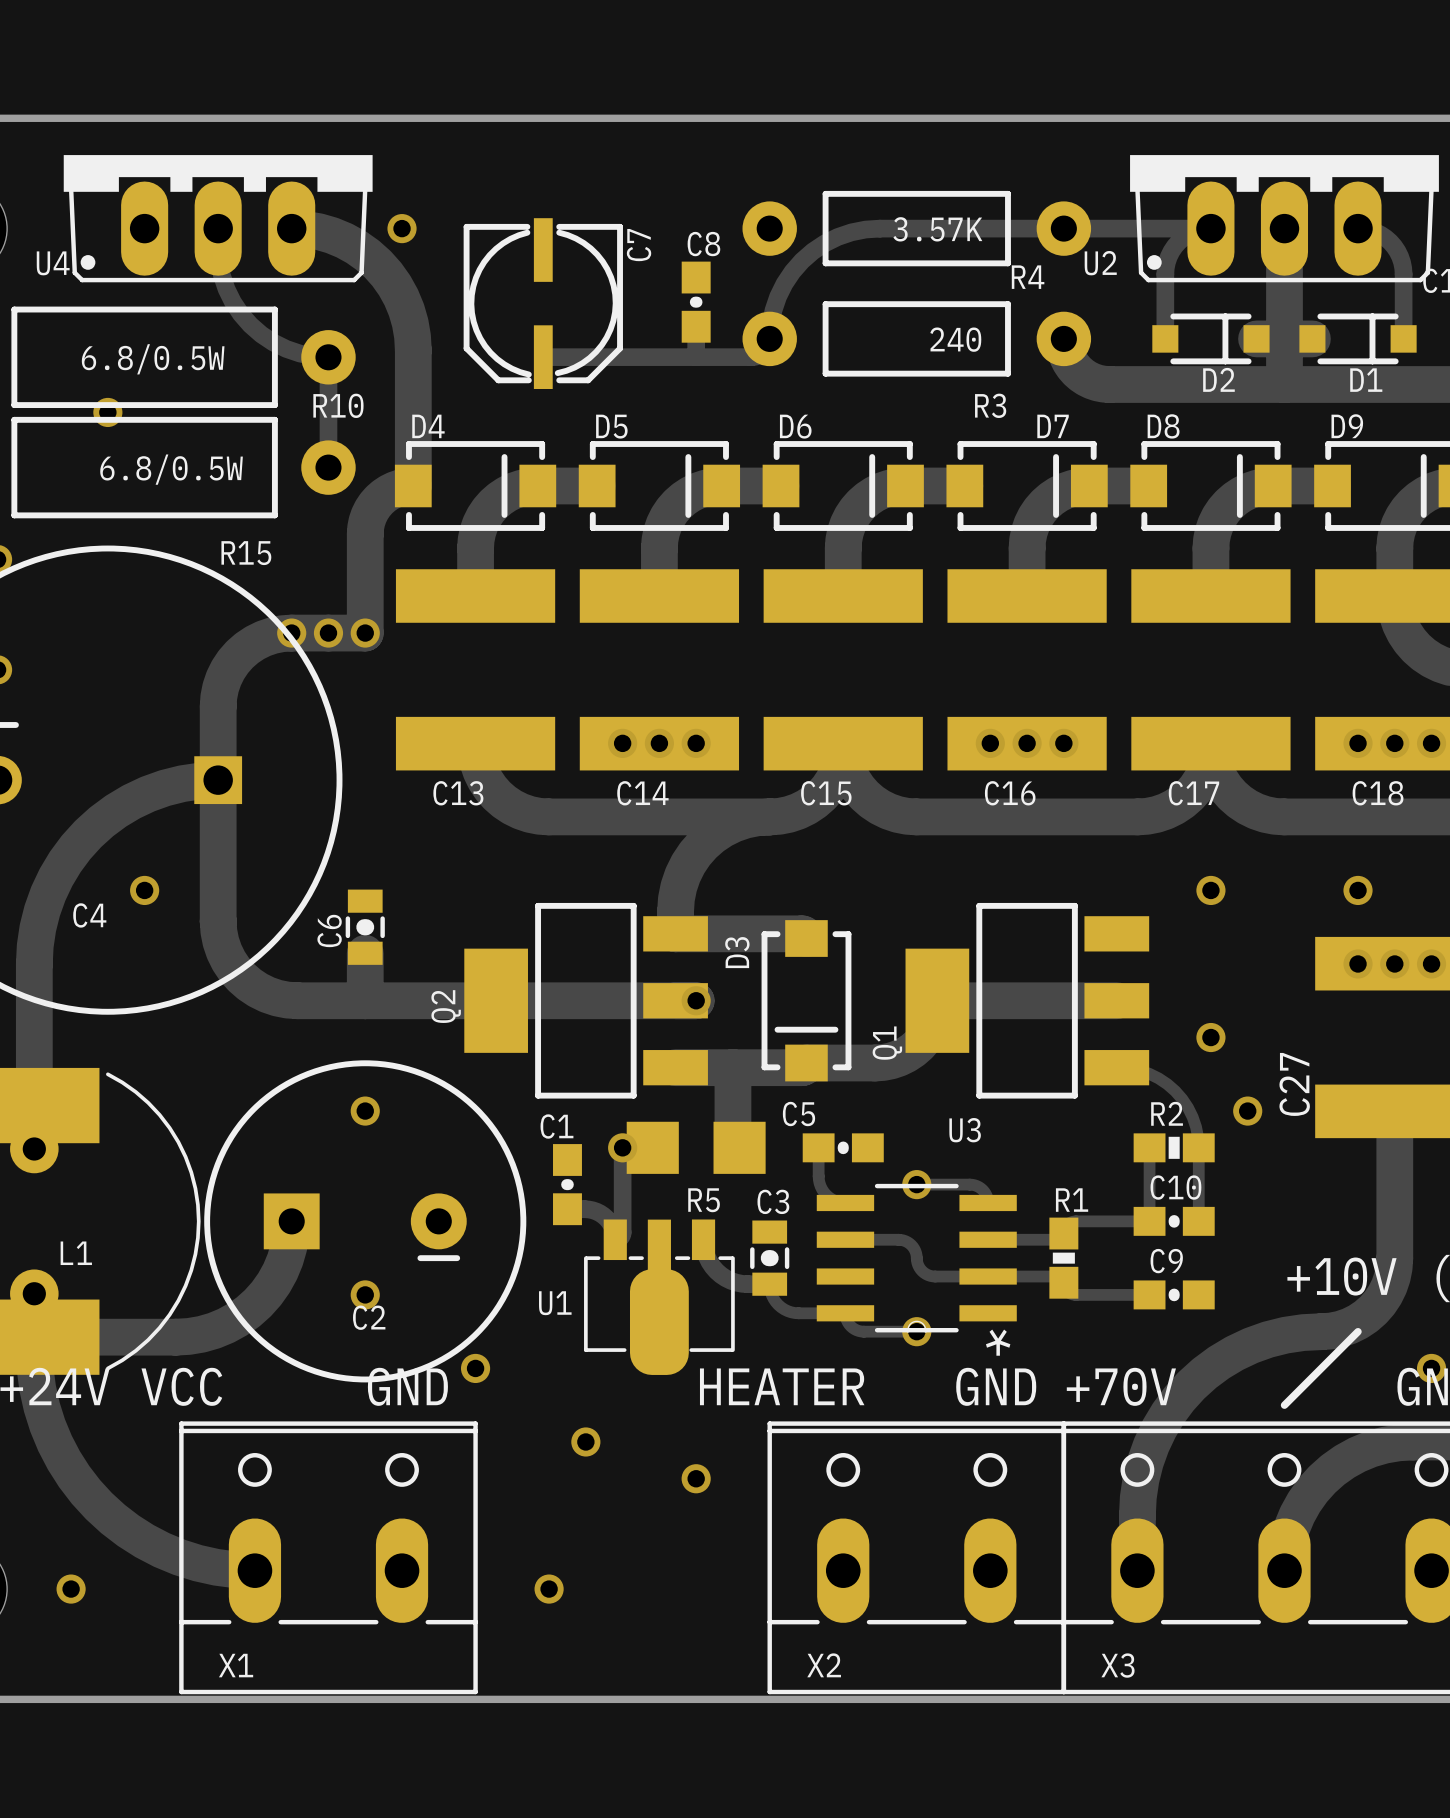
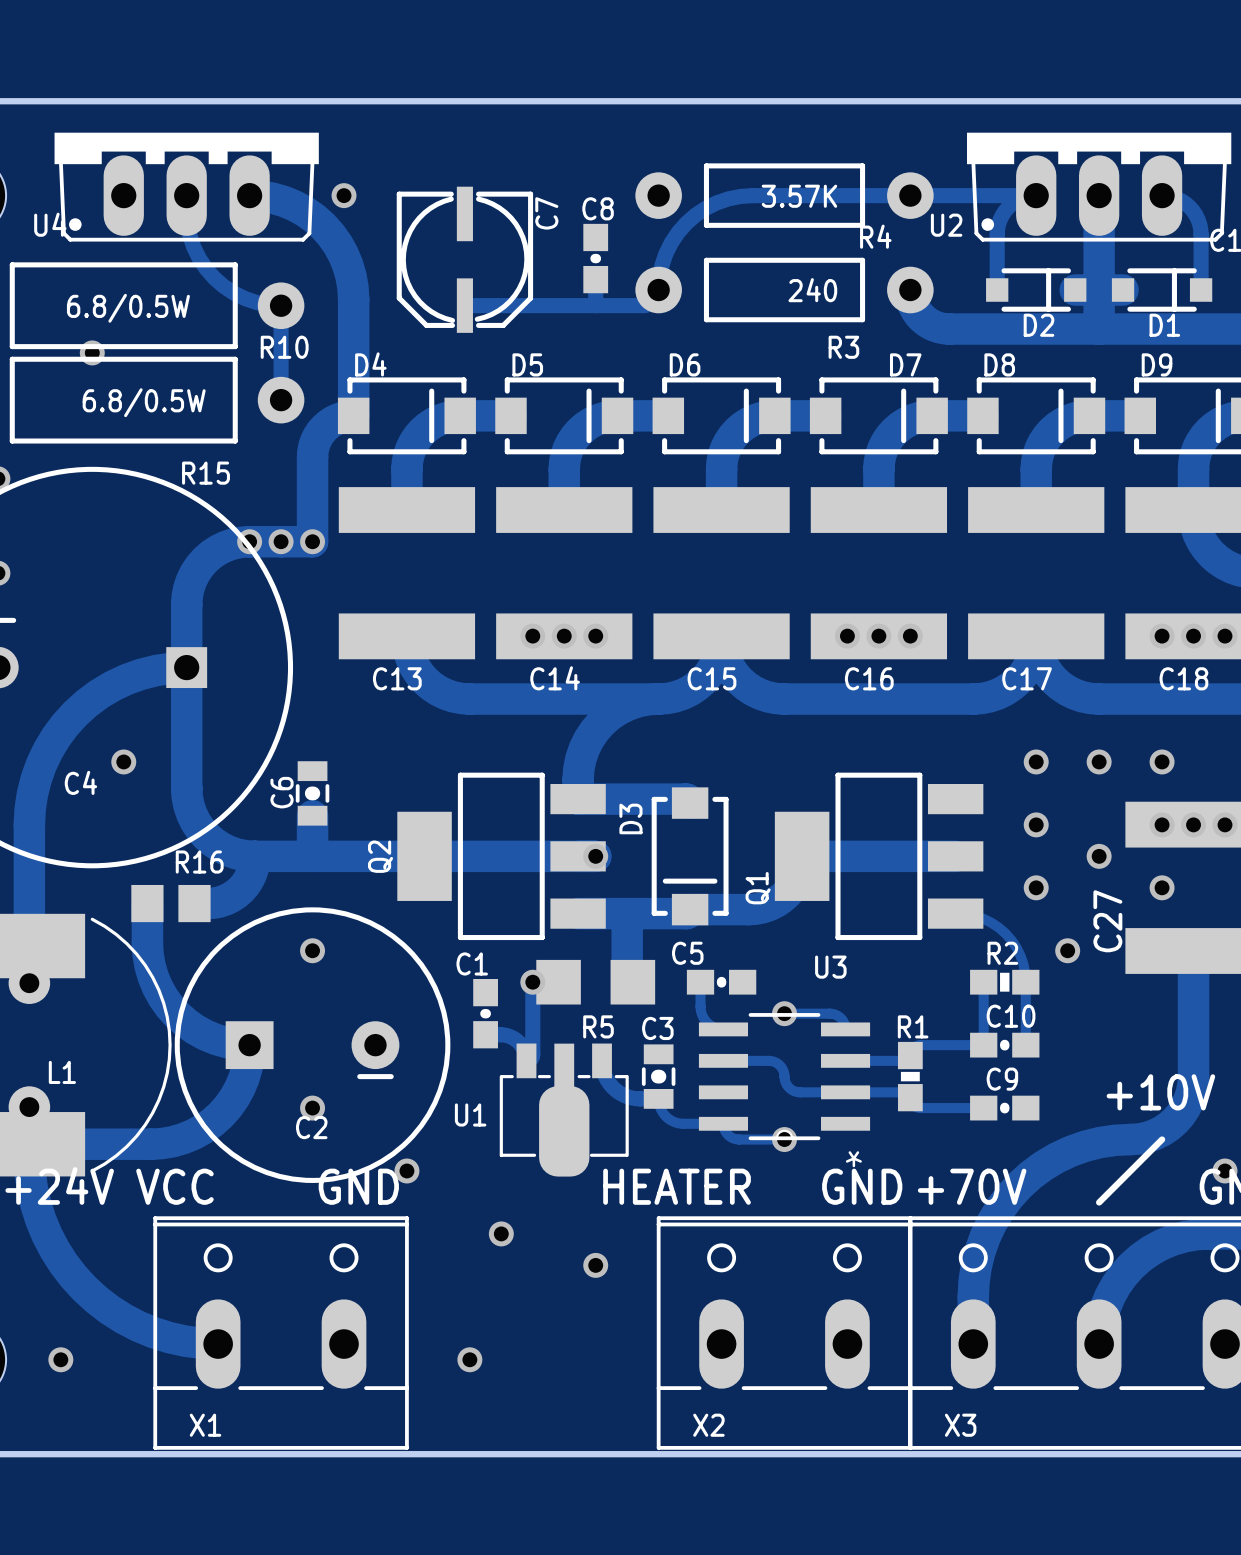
via: none -> (1099, 761)
via: none -> (1036, 824)
track: none -> (254, 856) (251, 874) (245, 885) (236, 893) (219, 901) (194, 903)
via: none -> (1099, 856)
via: none -> (1162, 887)
track: none -> (147, 903) (147, 942) (149, 965) (157, 987) (169, 1006) (185, 1022) (205, 1035) (226, 1042) (249, 1045)
R16: none -> (170, 903)

